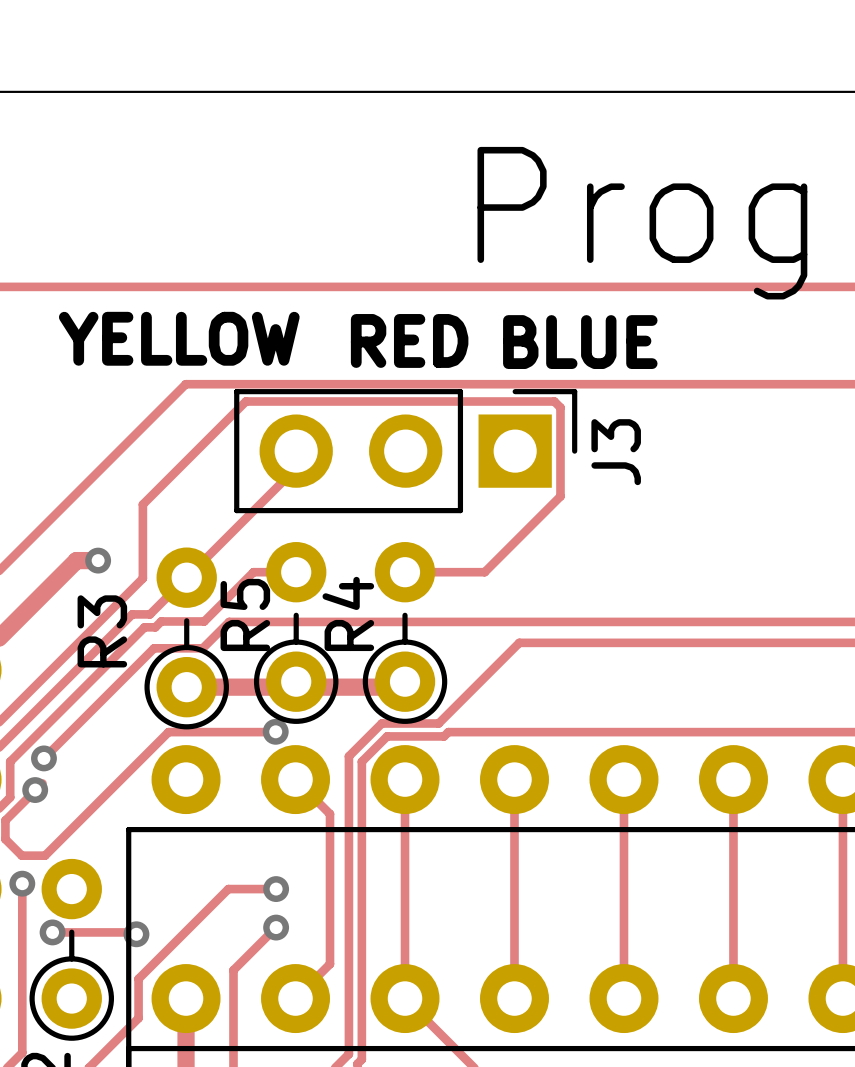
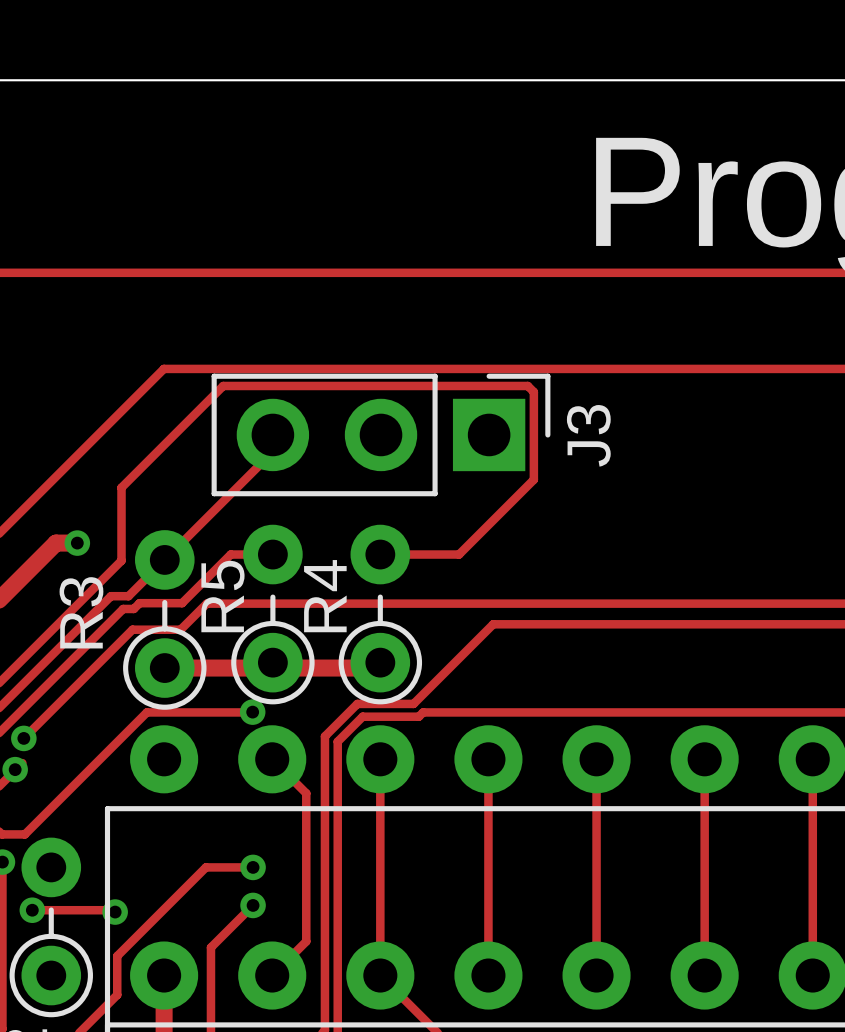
text: YELLOW (179, 338) -> none
text: RED (409, 340) -> none
text: BLUE (580, 342) -> none

